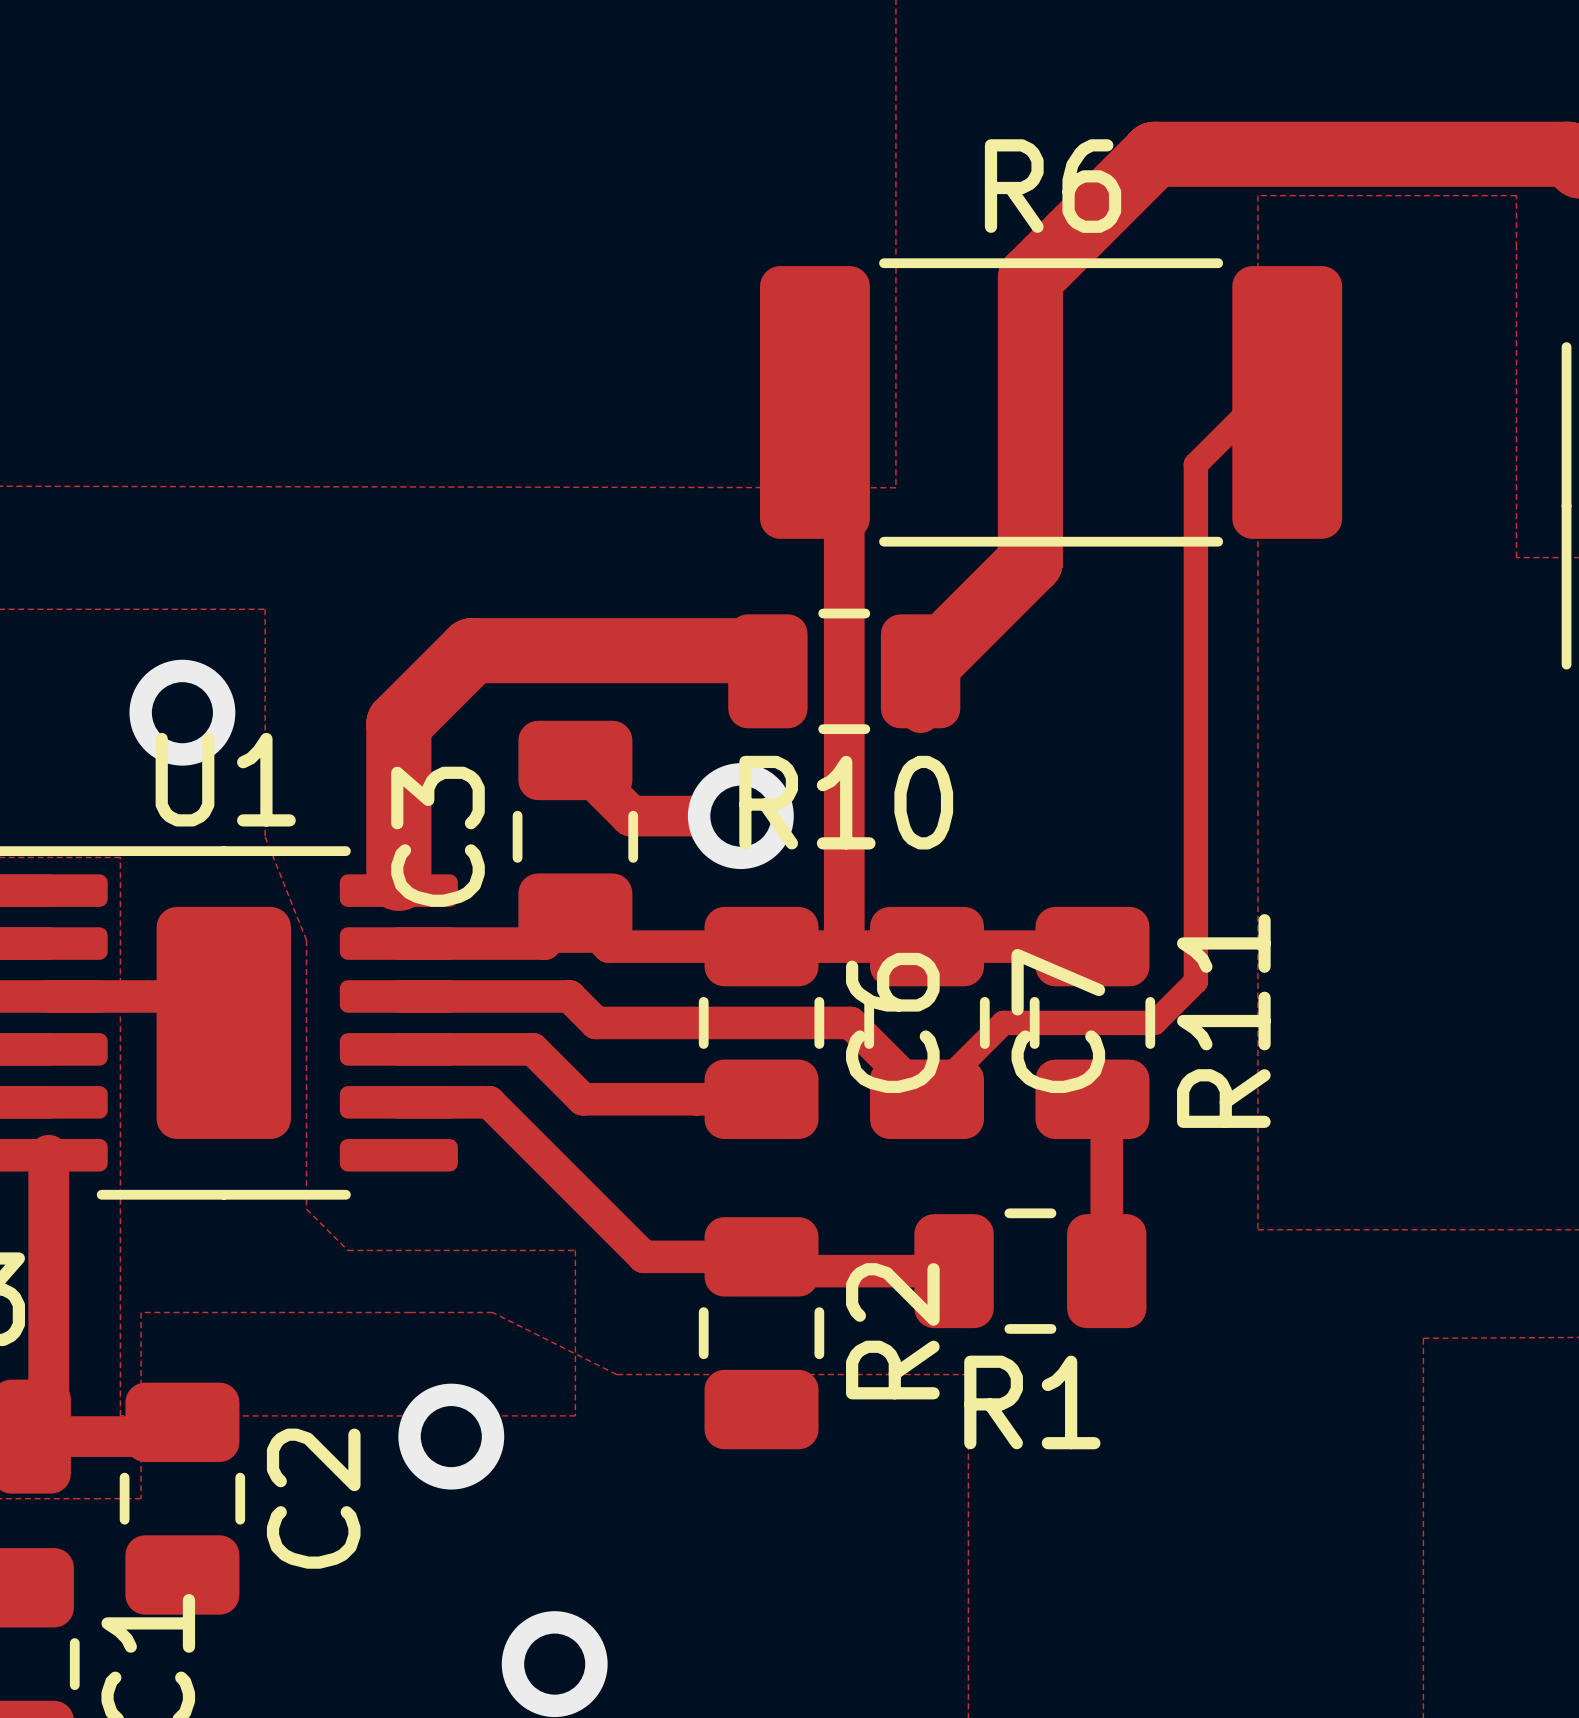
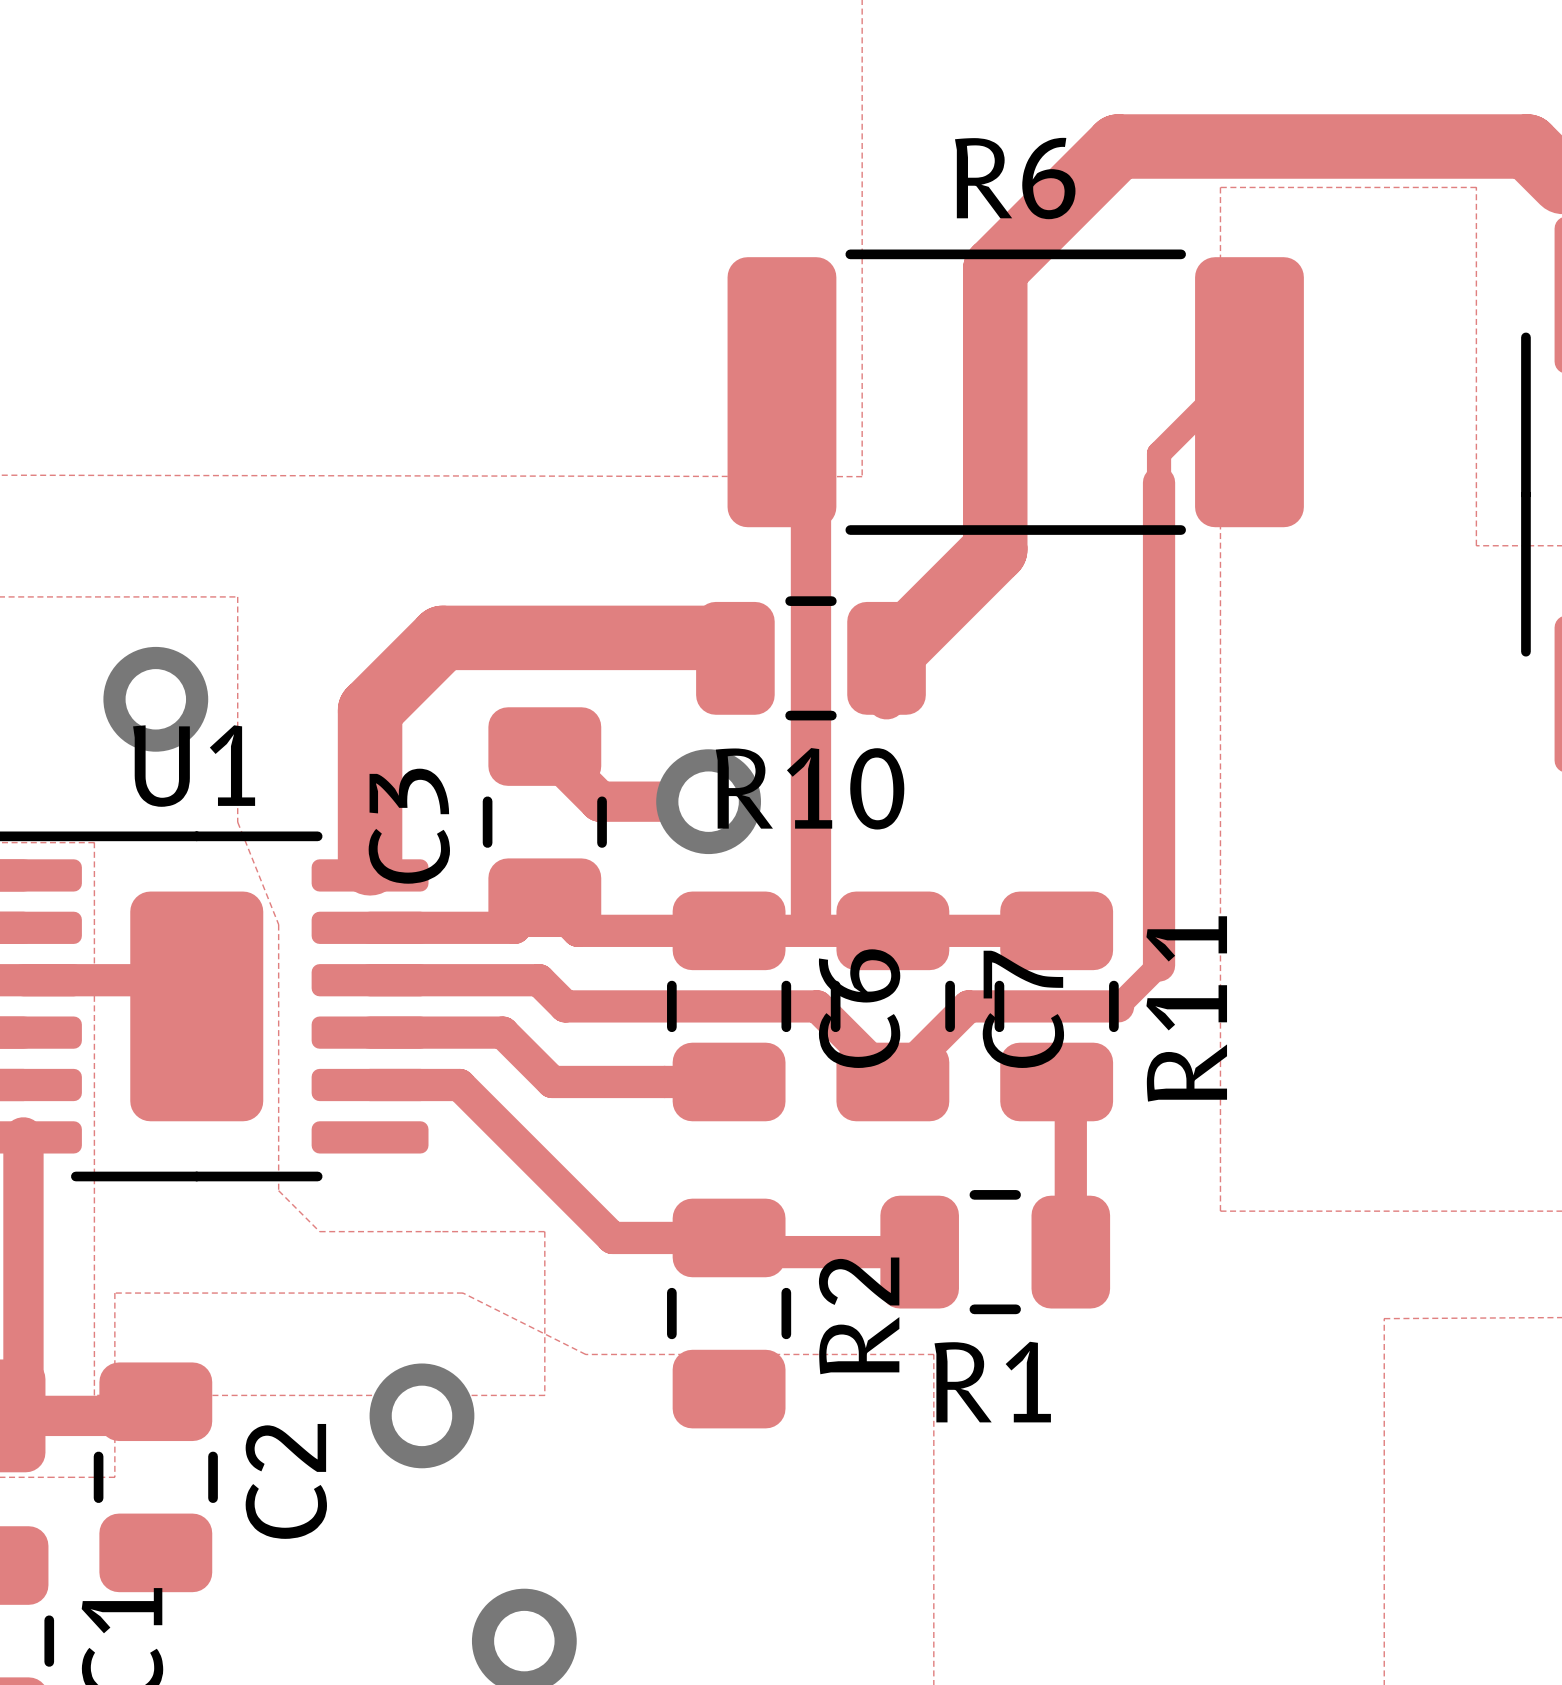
track width: thin (1195, 493) (1195, 981) -> thick (1159, 482) (1159, 965)
track width: thin (1154, 1022) (1003, 1022) (927, 1099) -> thick (1118, 1006) (968, 1006) (892, 1081)

